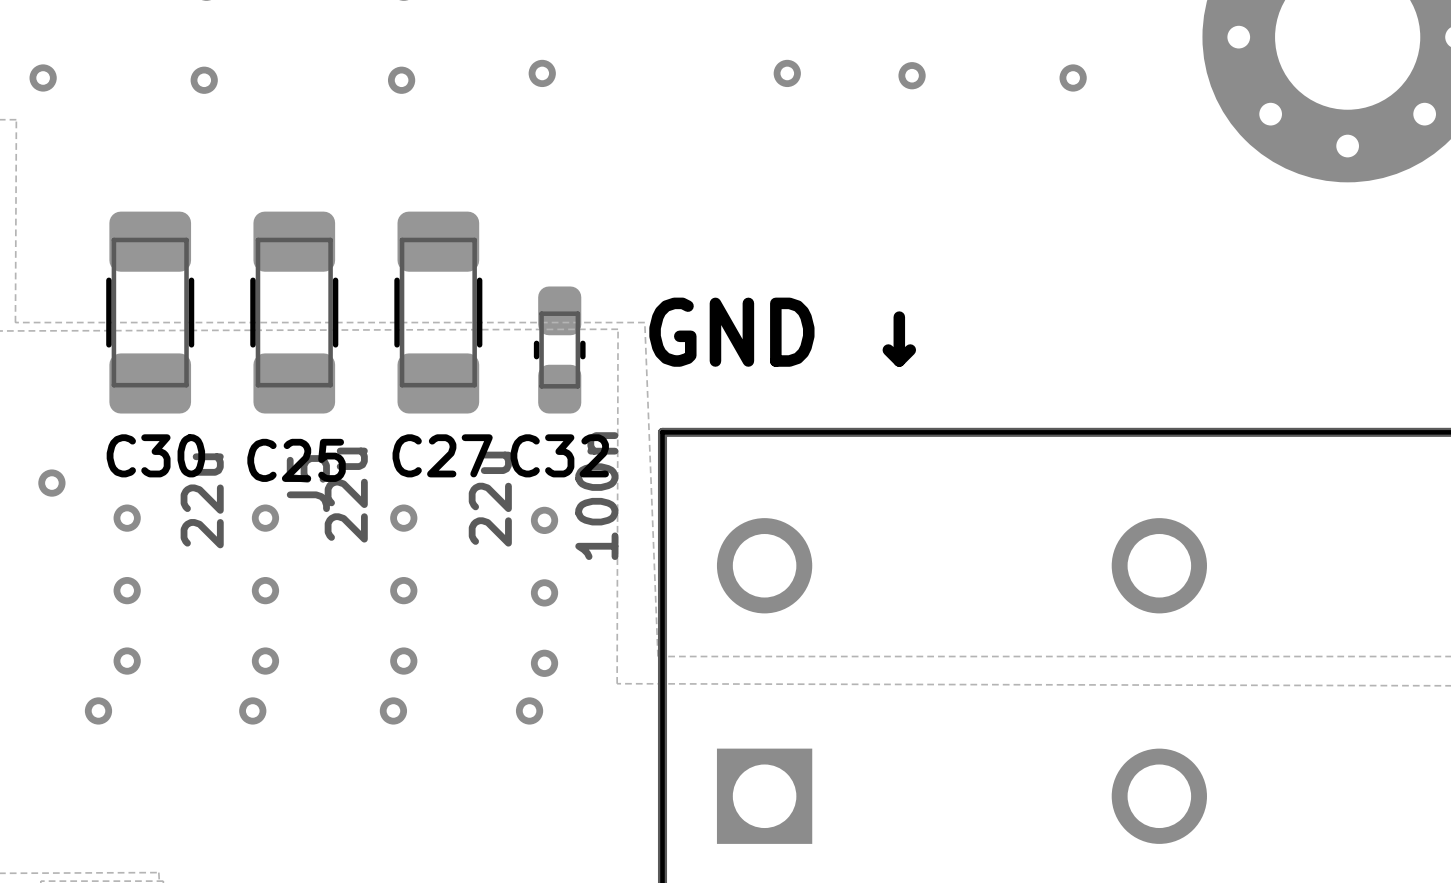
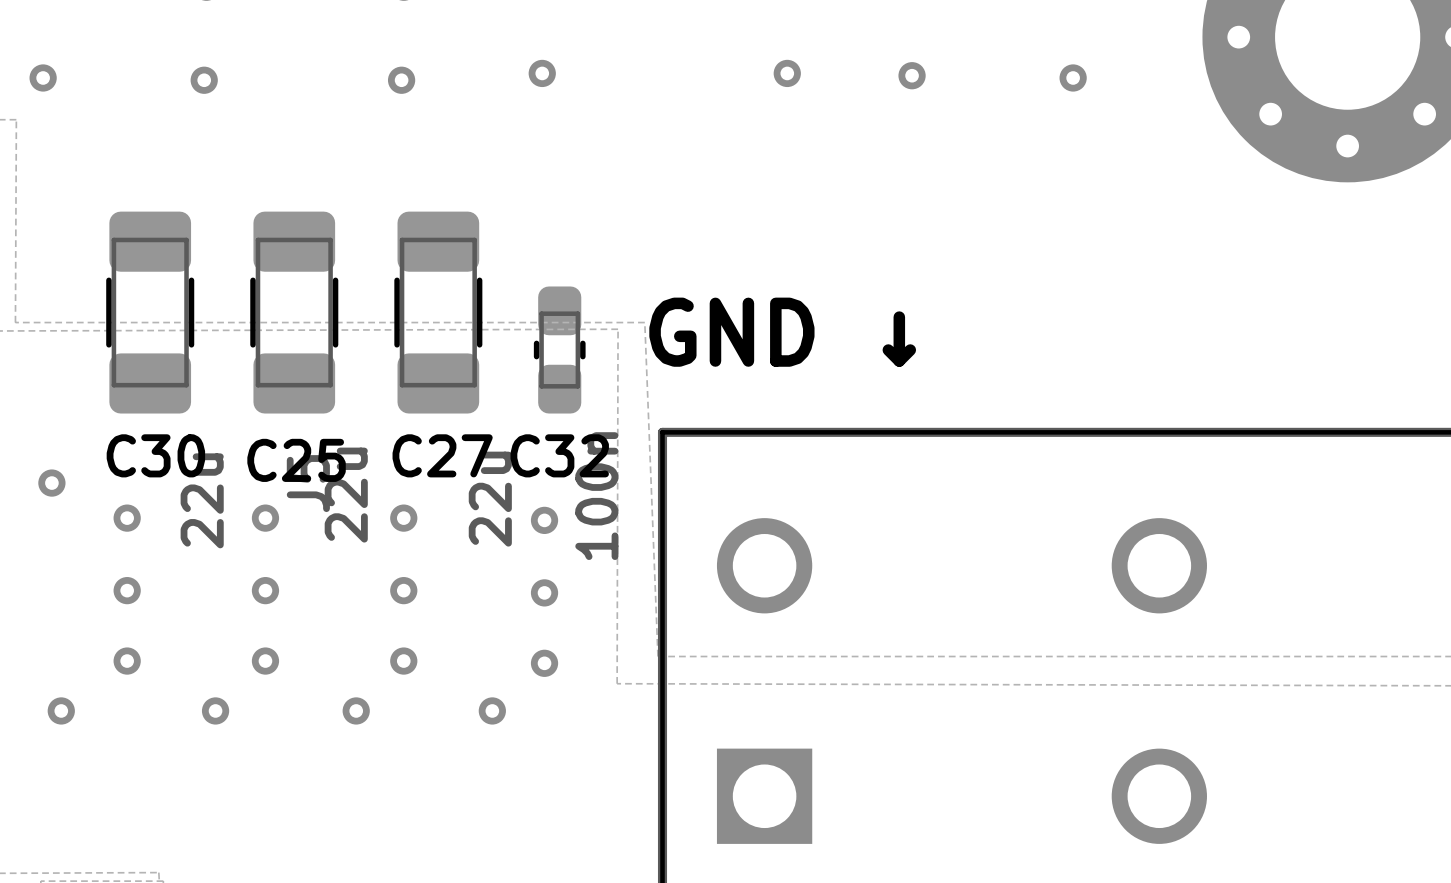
via position: (98, 710) -> (61, 710)
via position: (252, 710) -> (215, 710)
via position: (393, 710) -> (356, 710)
via position: (529, 710) -> (492, 710)

